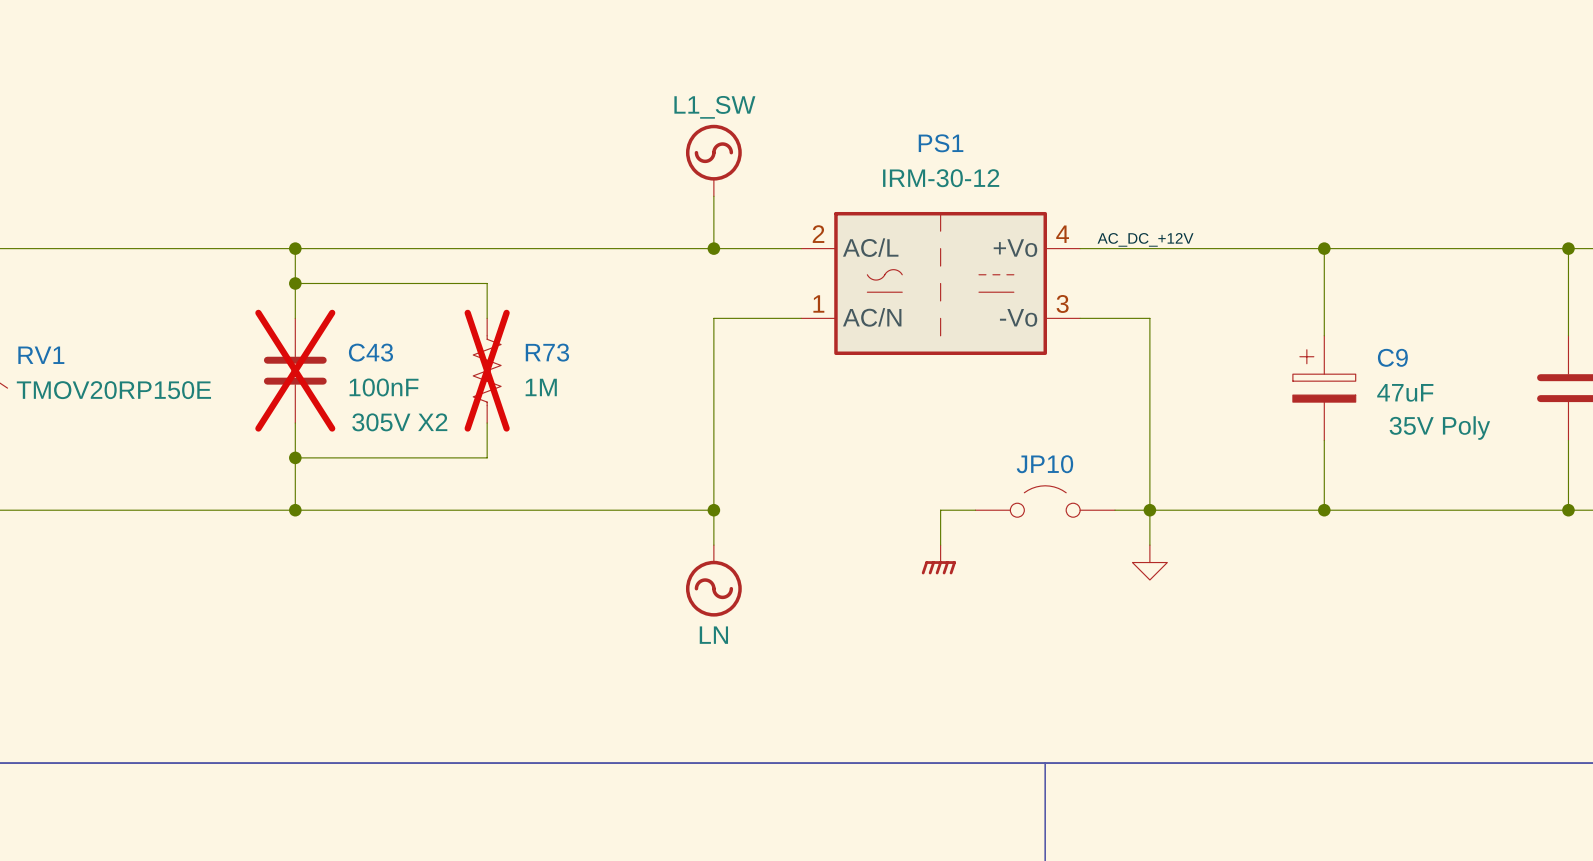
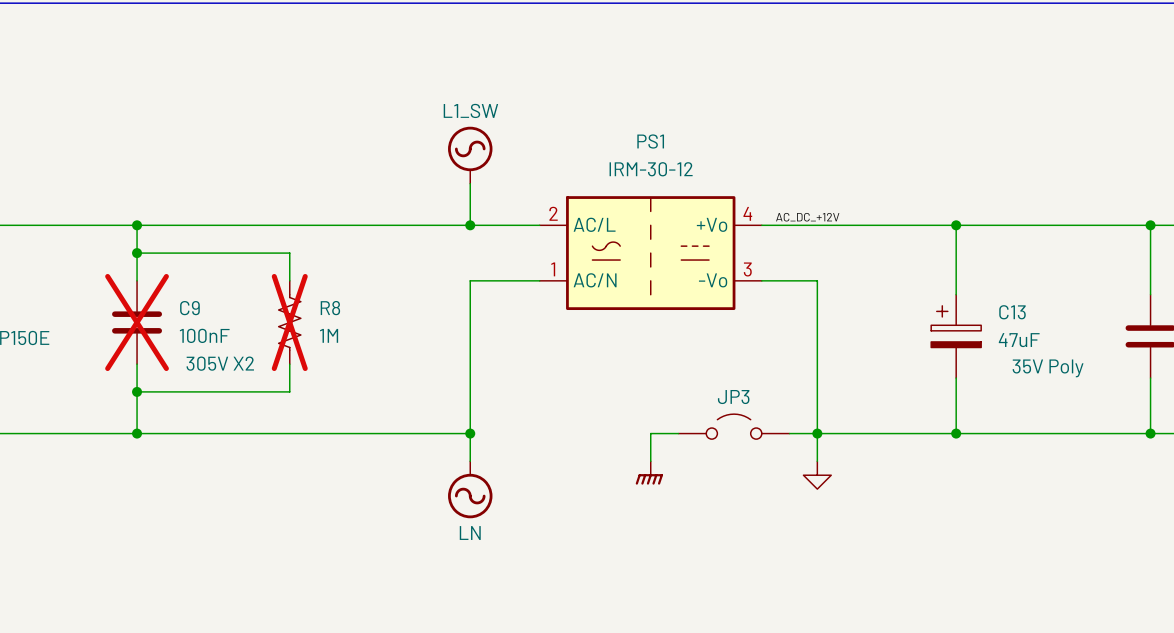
C43 name: C43 (370, 352) -> C9 (189, 308)
R73 name: R73 (547, 352) -> R8 (330, 308)
C9 name: C9 (1392, 357) -> C13 (1012, 312)
JP10 name: JP10 (1044, 464) -> JP3 (733, 397)

